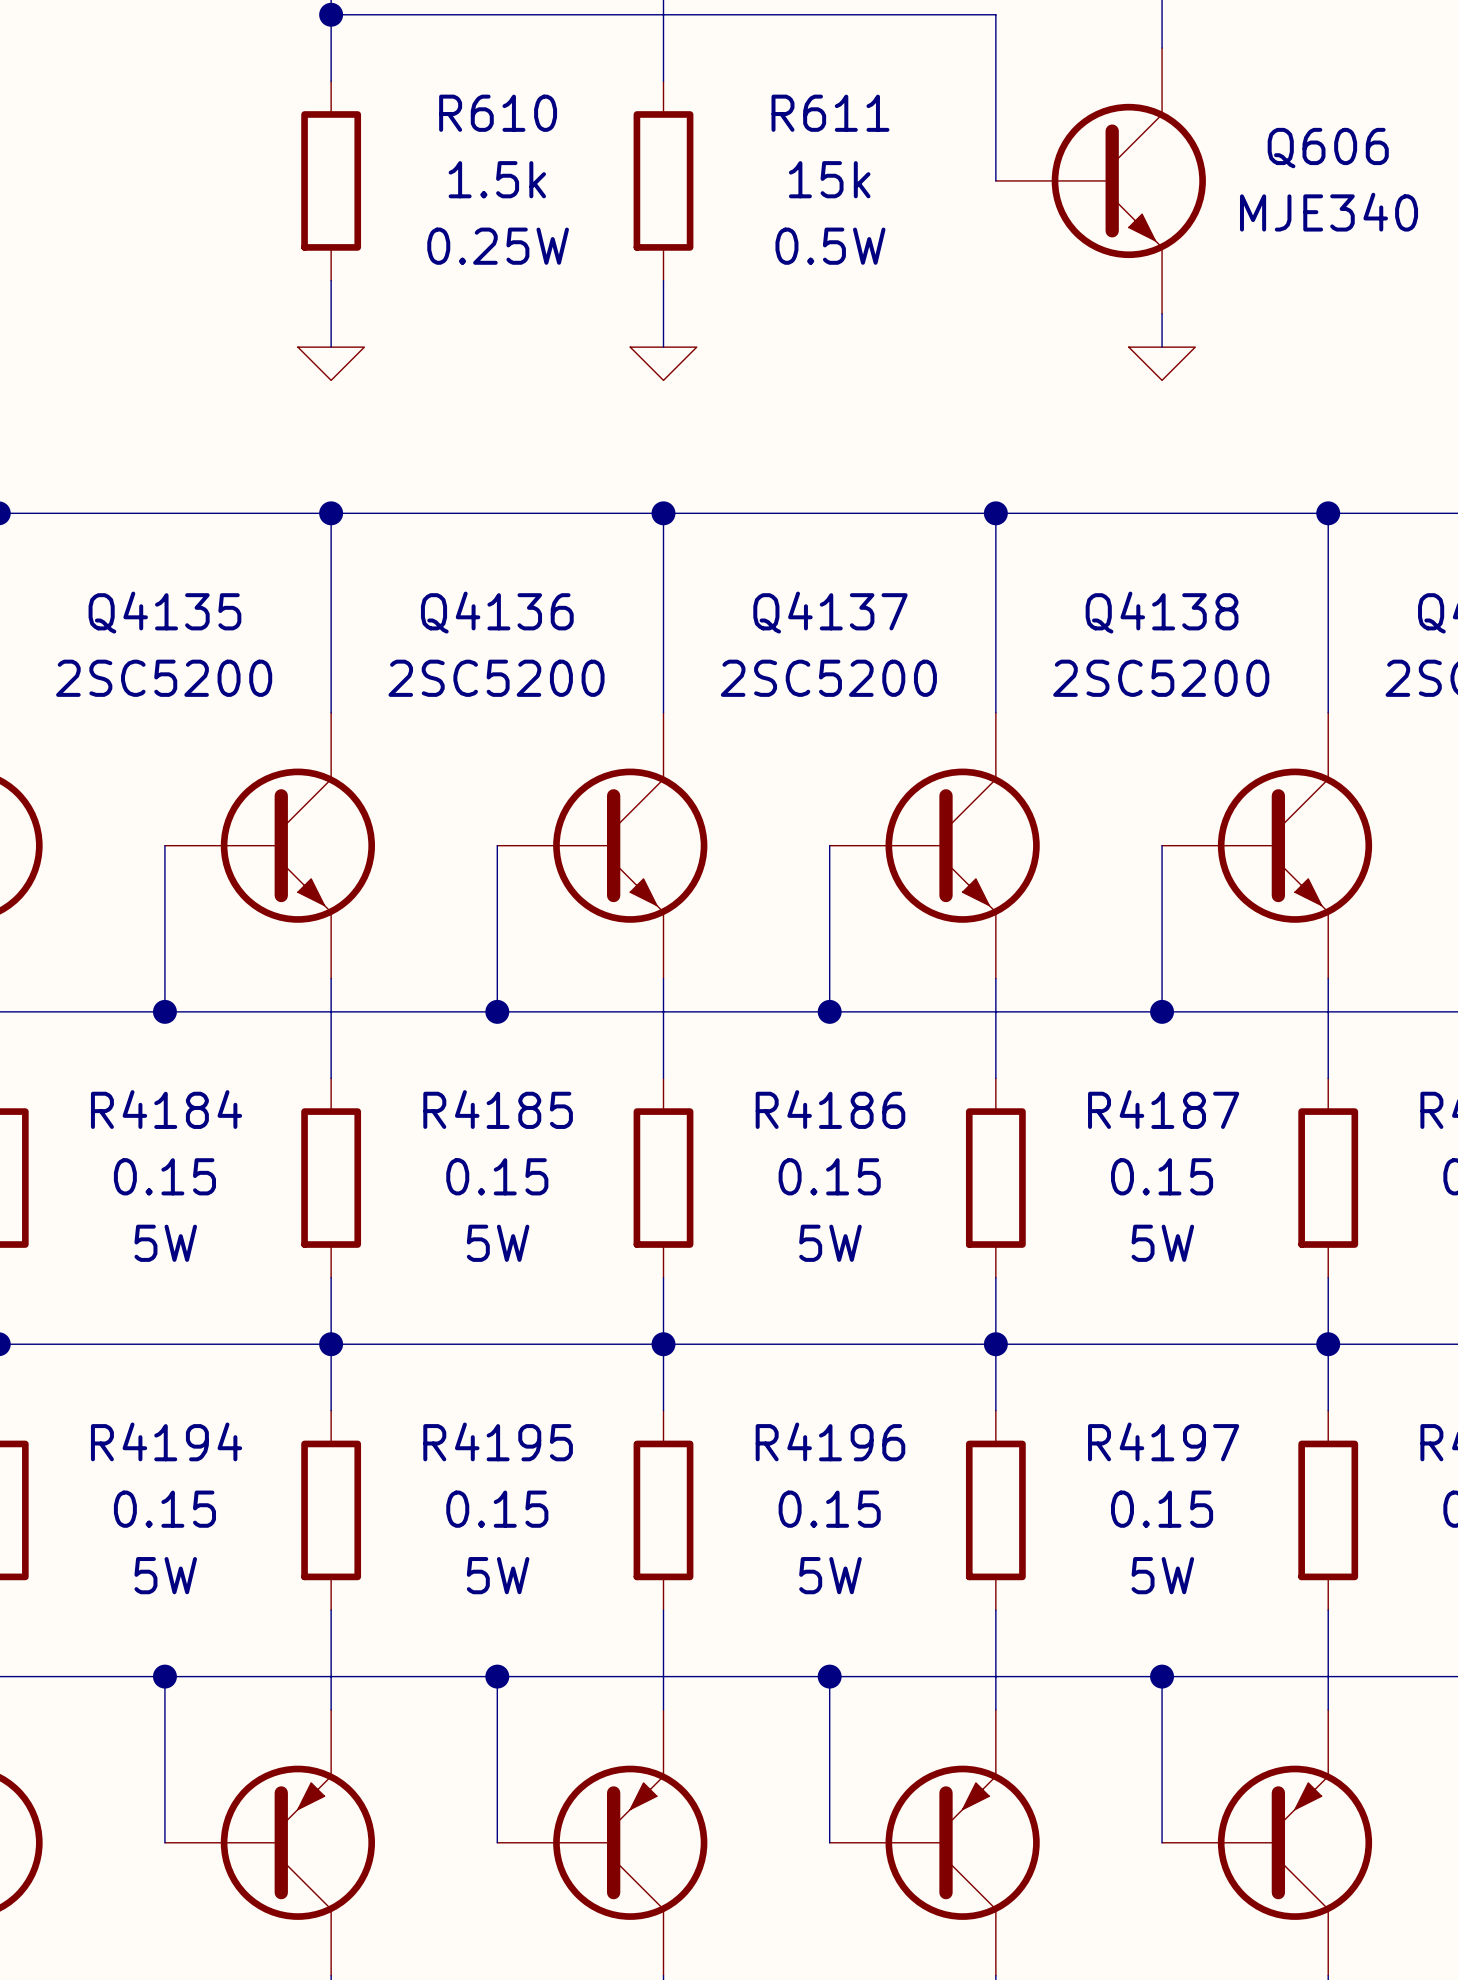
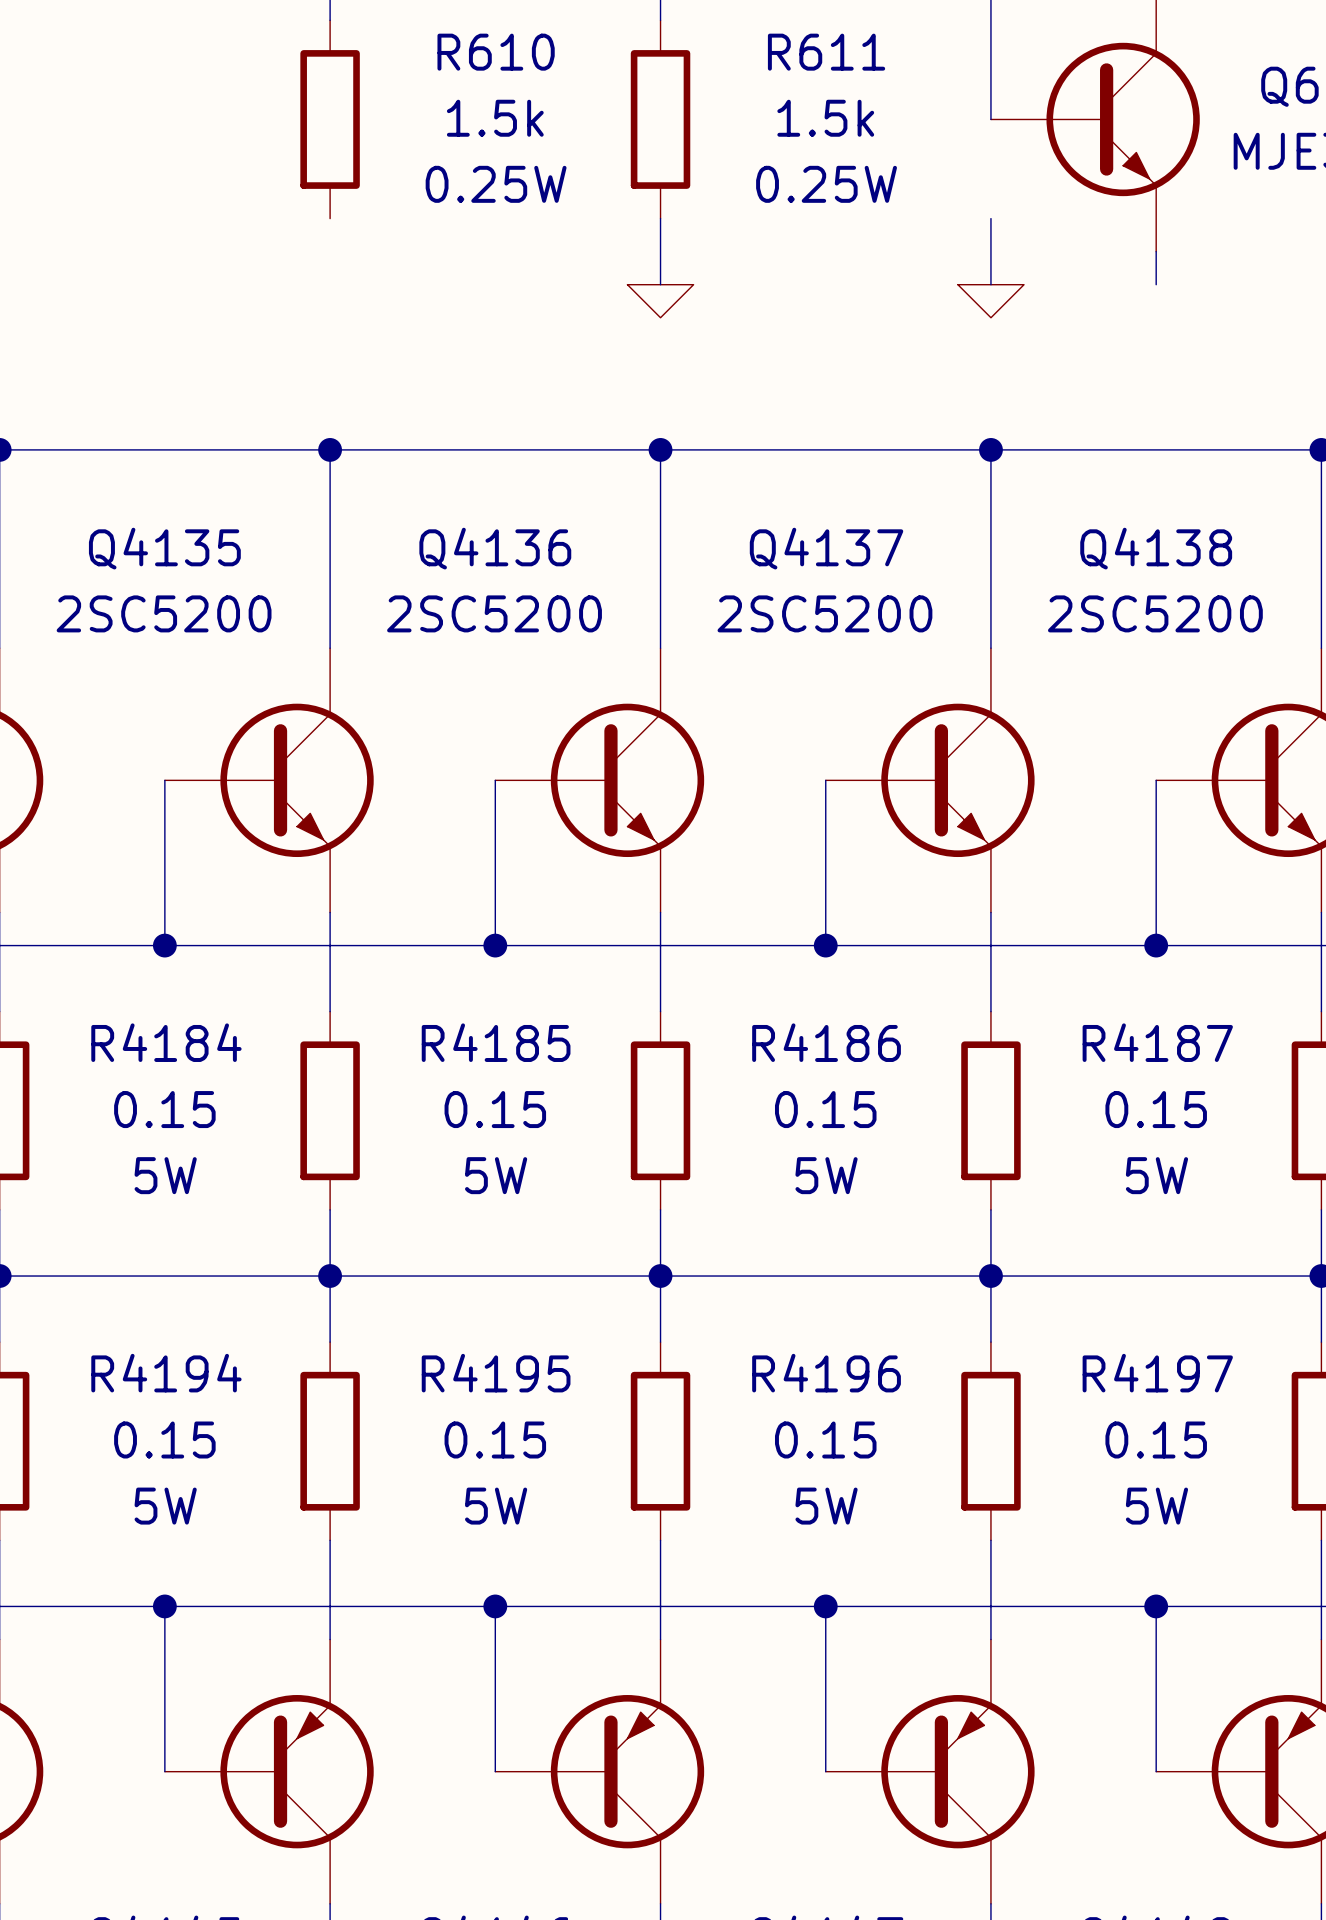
R611 value: 15k (829, 179) -> 1.5k (825, 118)
R611 text: 0.5W (830, 246) -> 0.25W (826, 184)
wire: (331, 280) (331, 347) -> none
wire: none -> (990, 218) (990, 284)
power symbol: (331, 363) -> none
power symbol position: (1162, 363) -> (990, 301)

